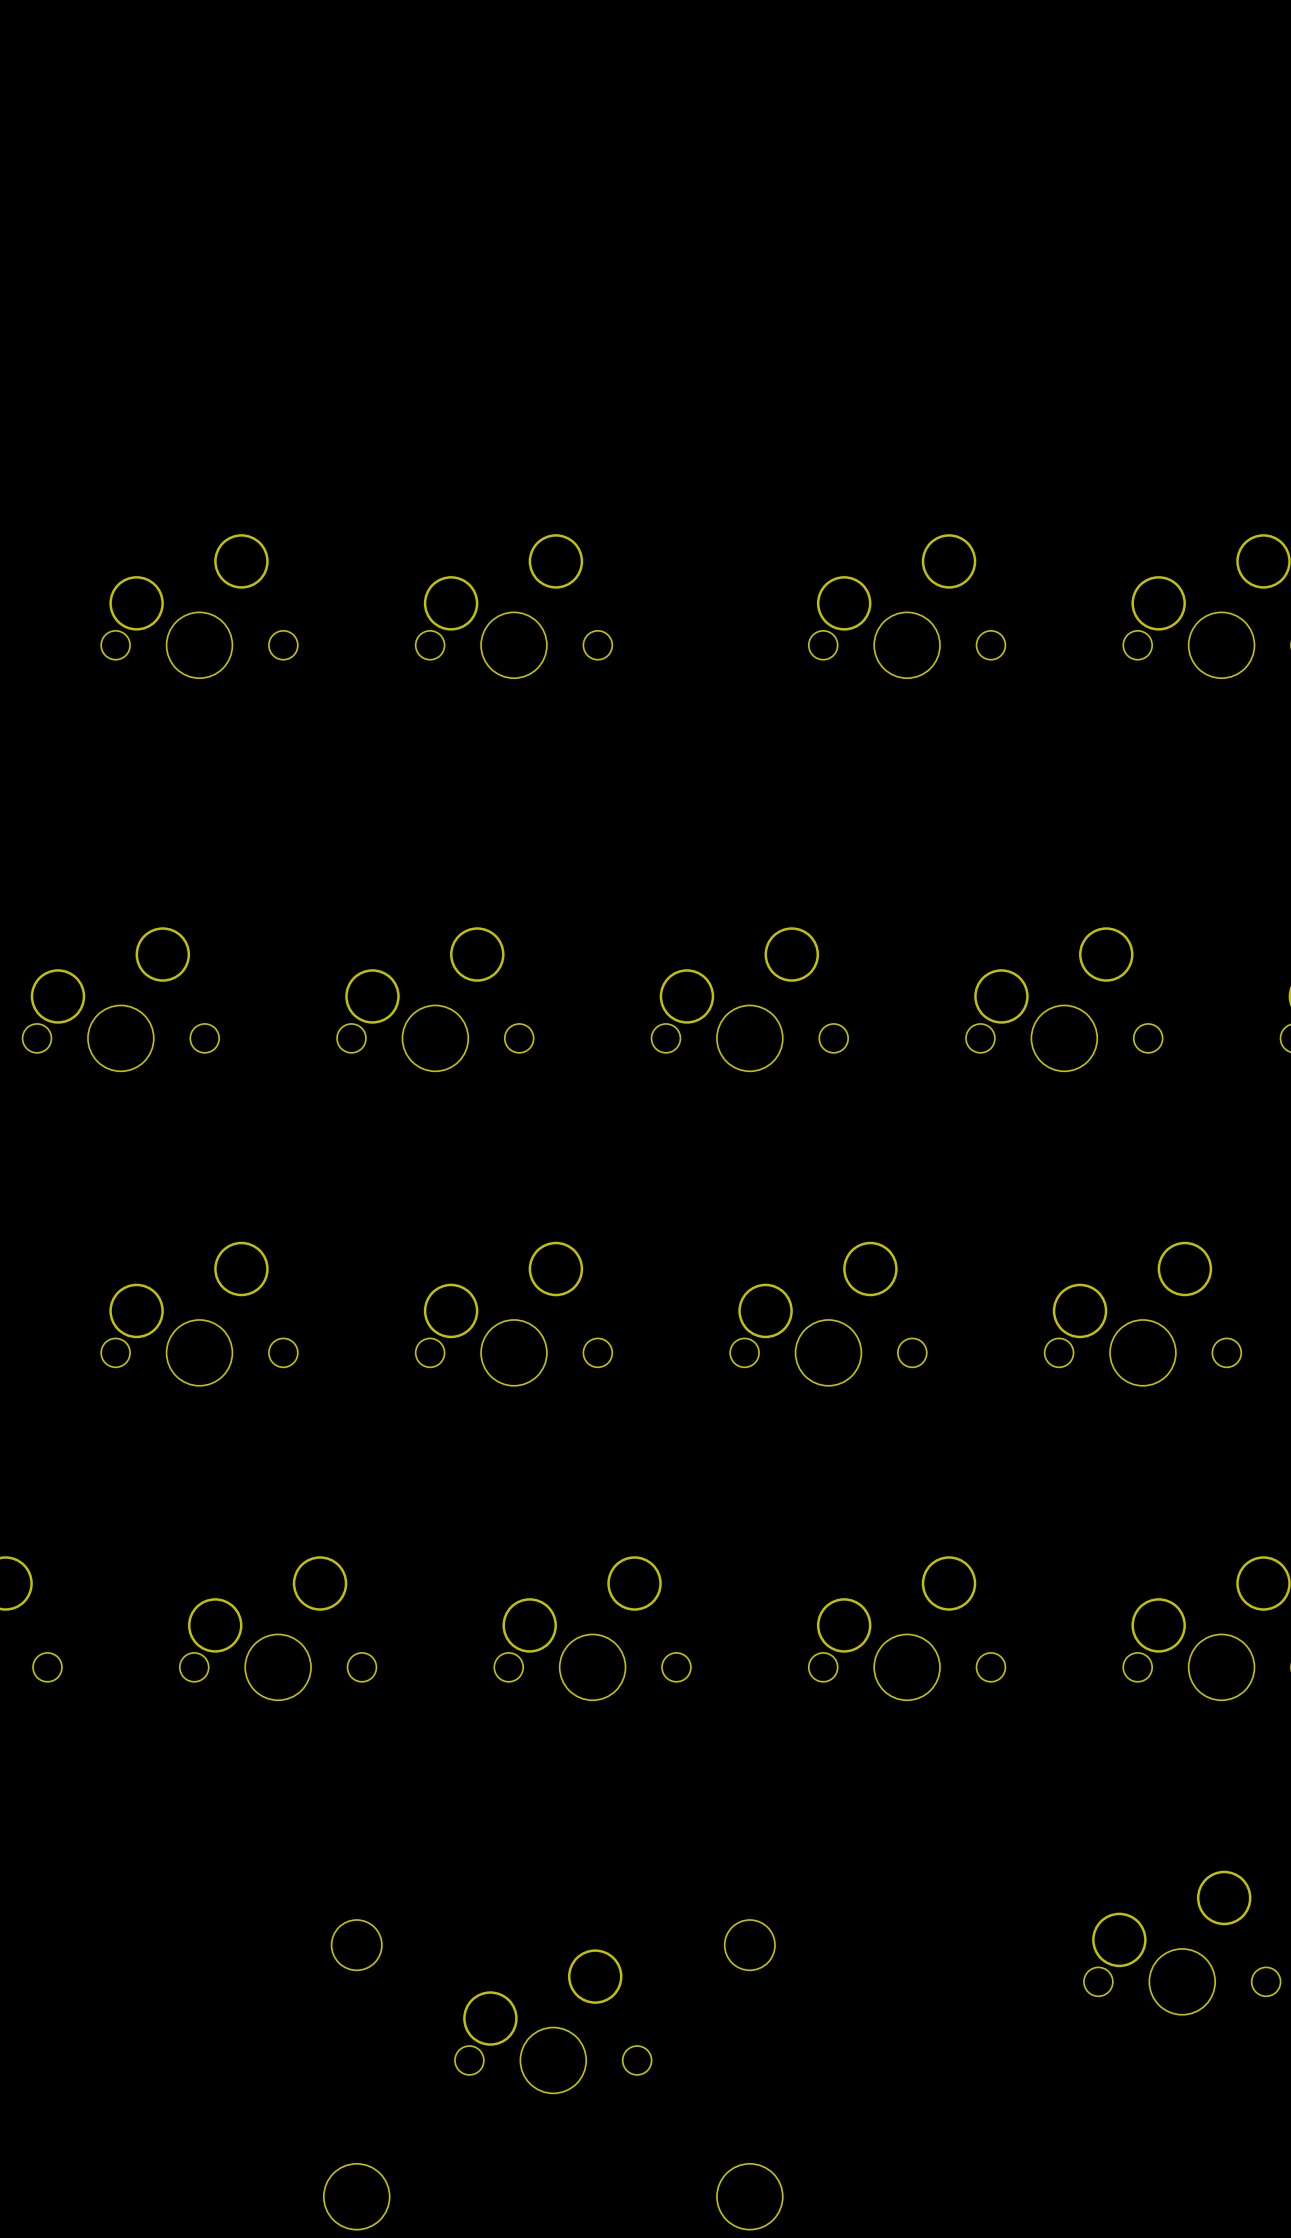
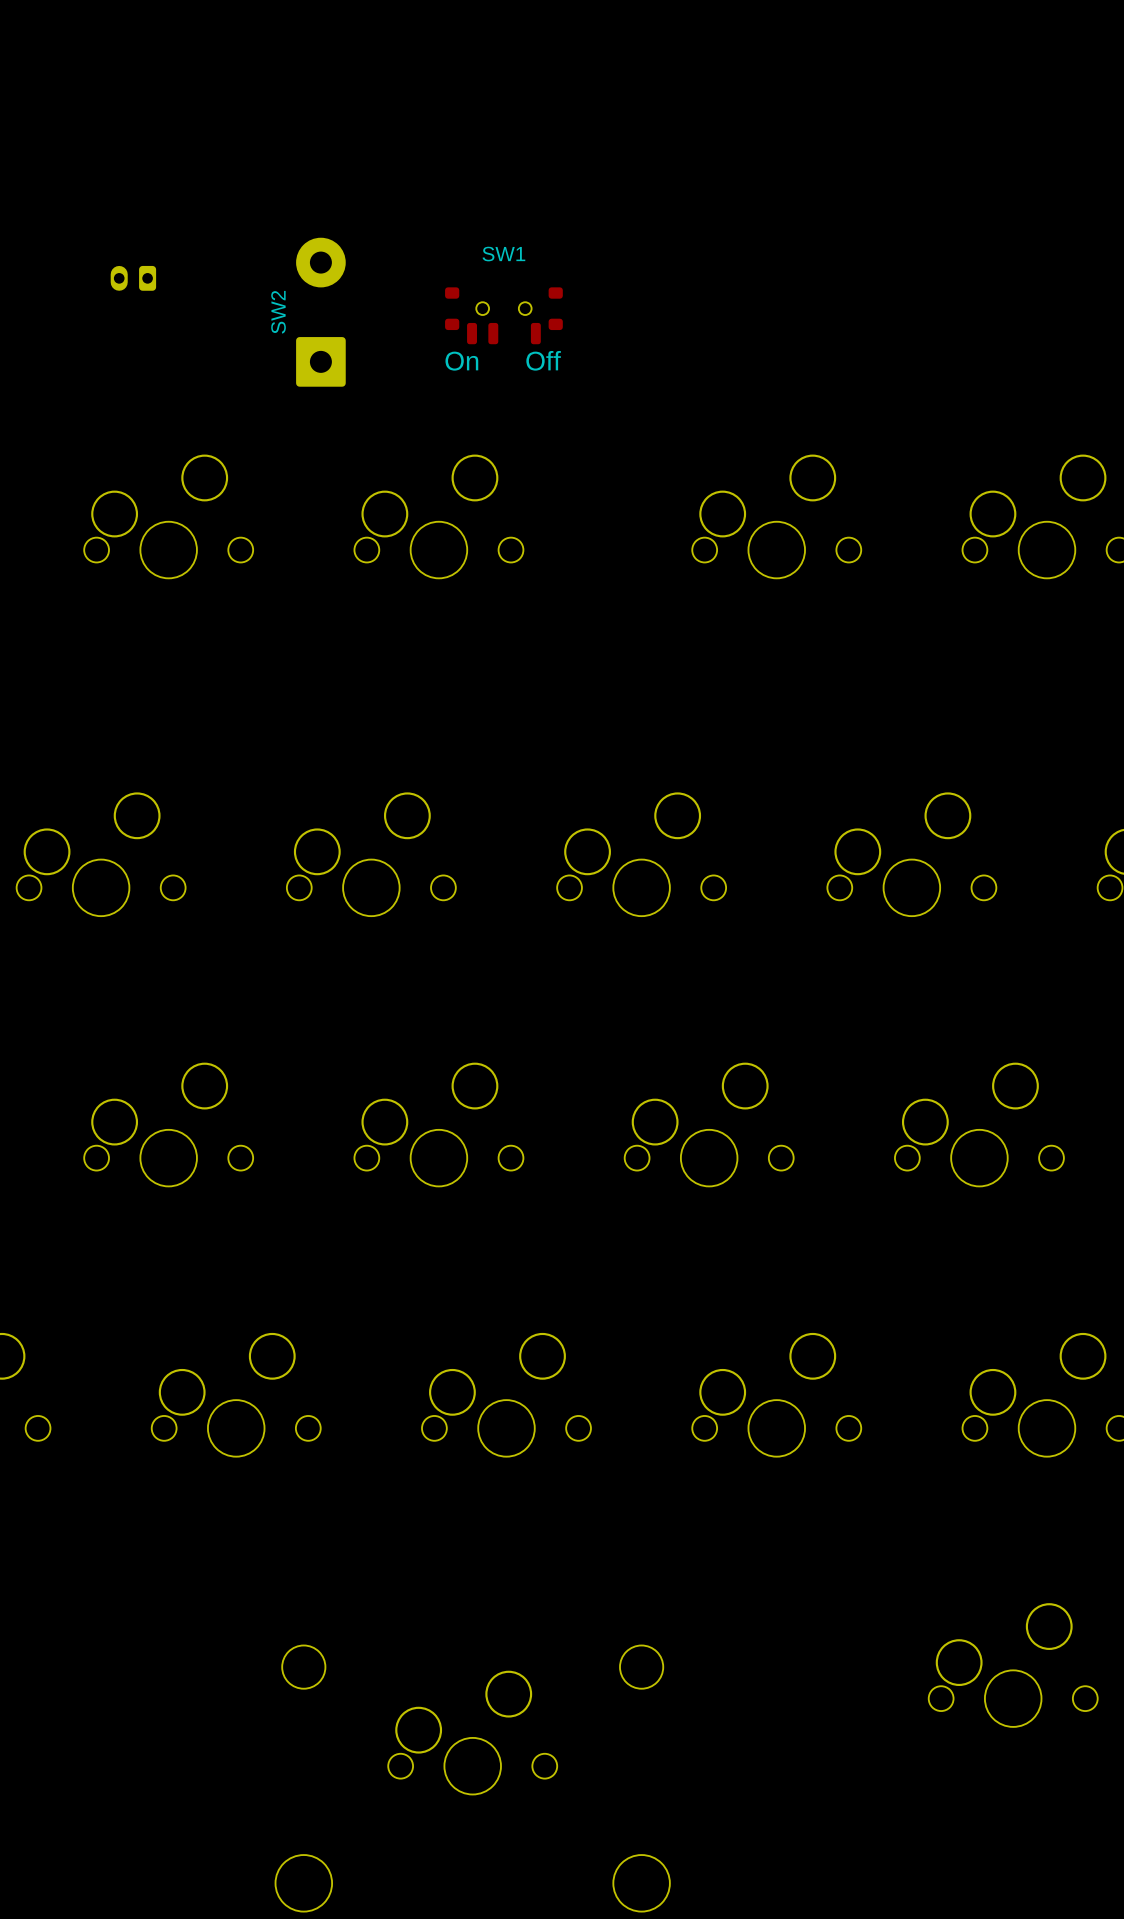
part: none -> (133, 278)
SW2: none -> (320, 312)
SW1: none -> (503, 315)

